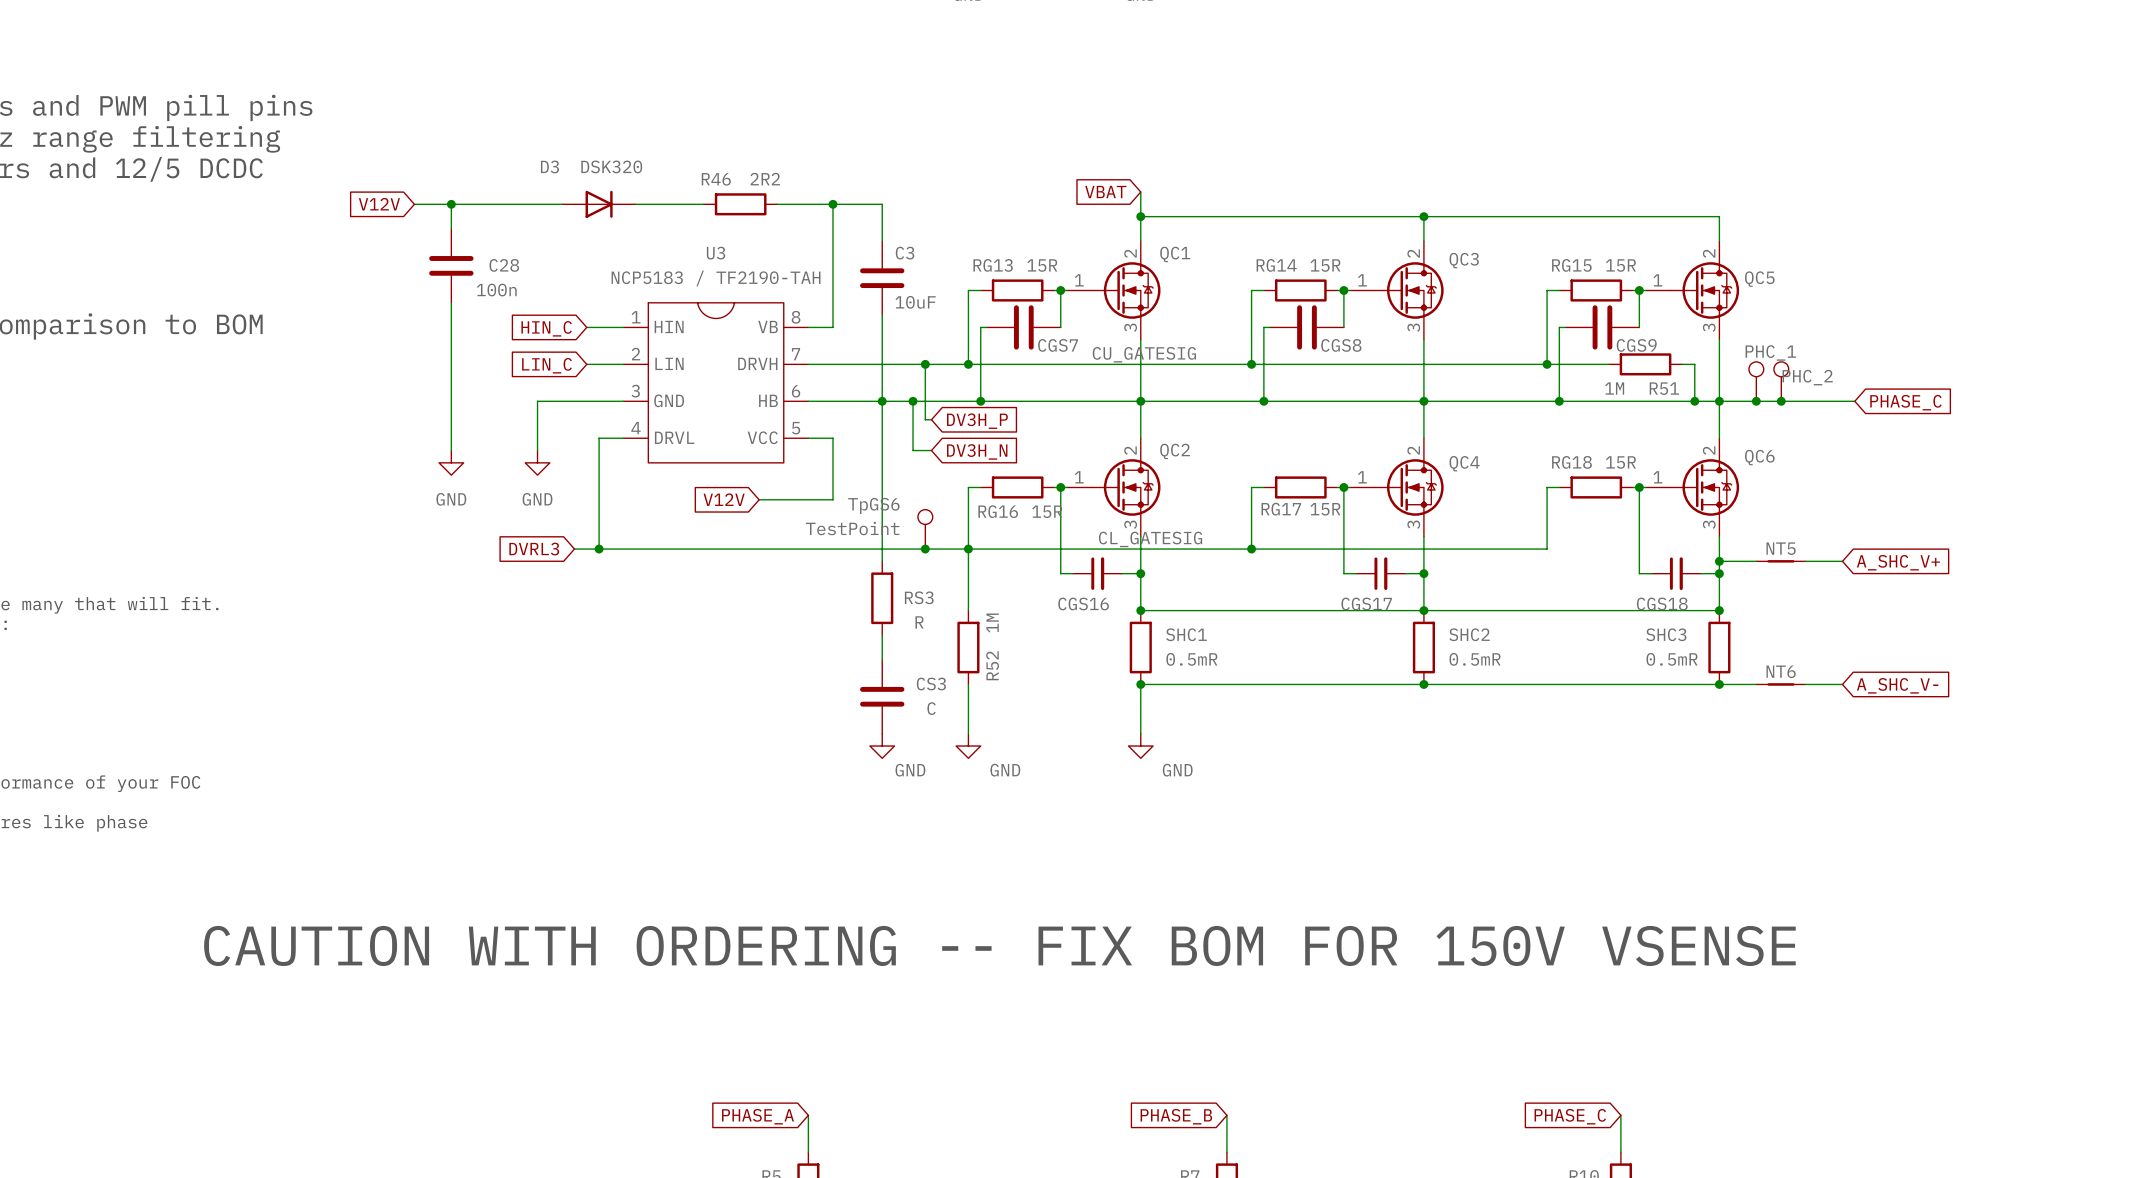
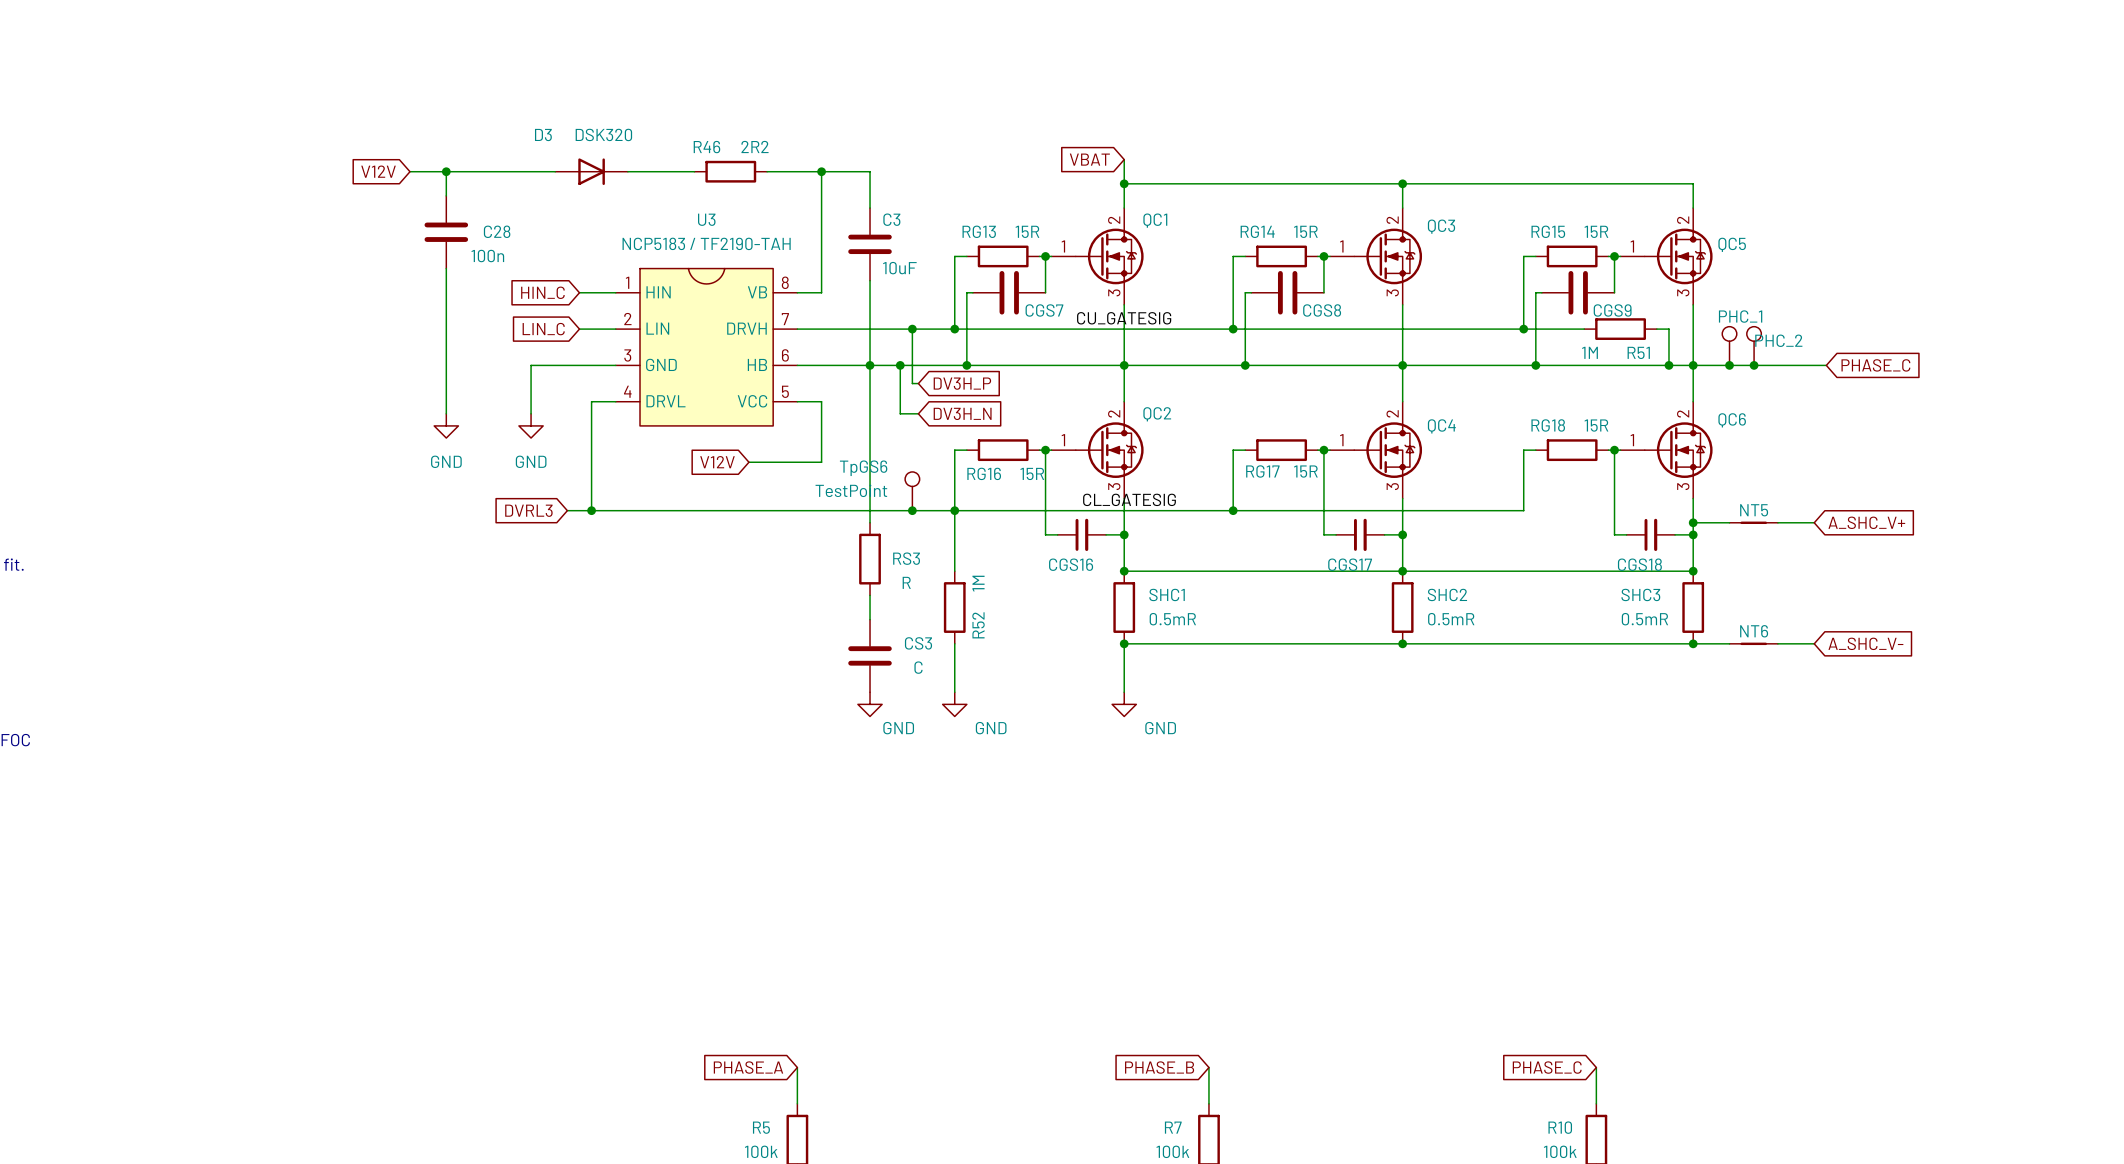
text: CAUTION WITH ORDERING -- FIX BOM FOR 150V VSENSE (999, 945) -> none

